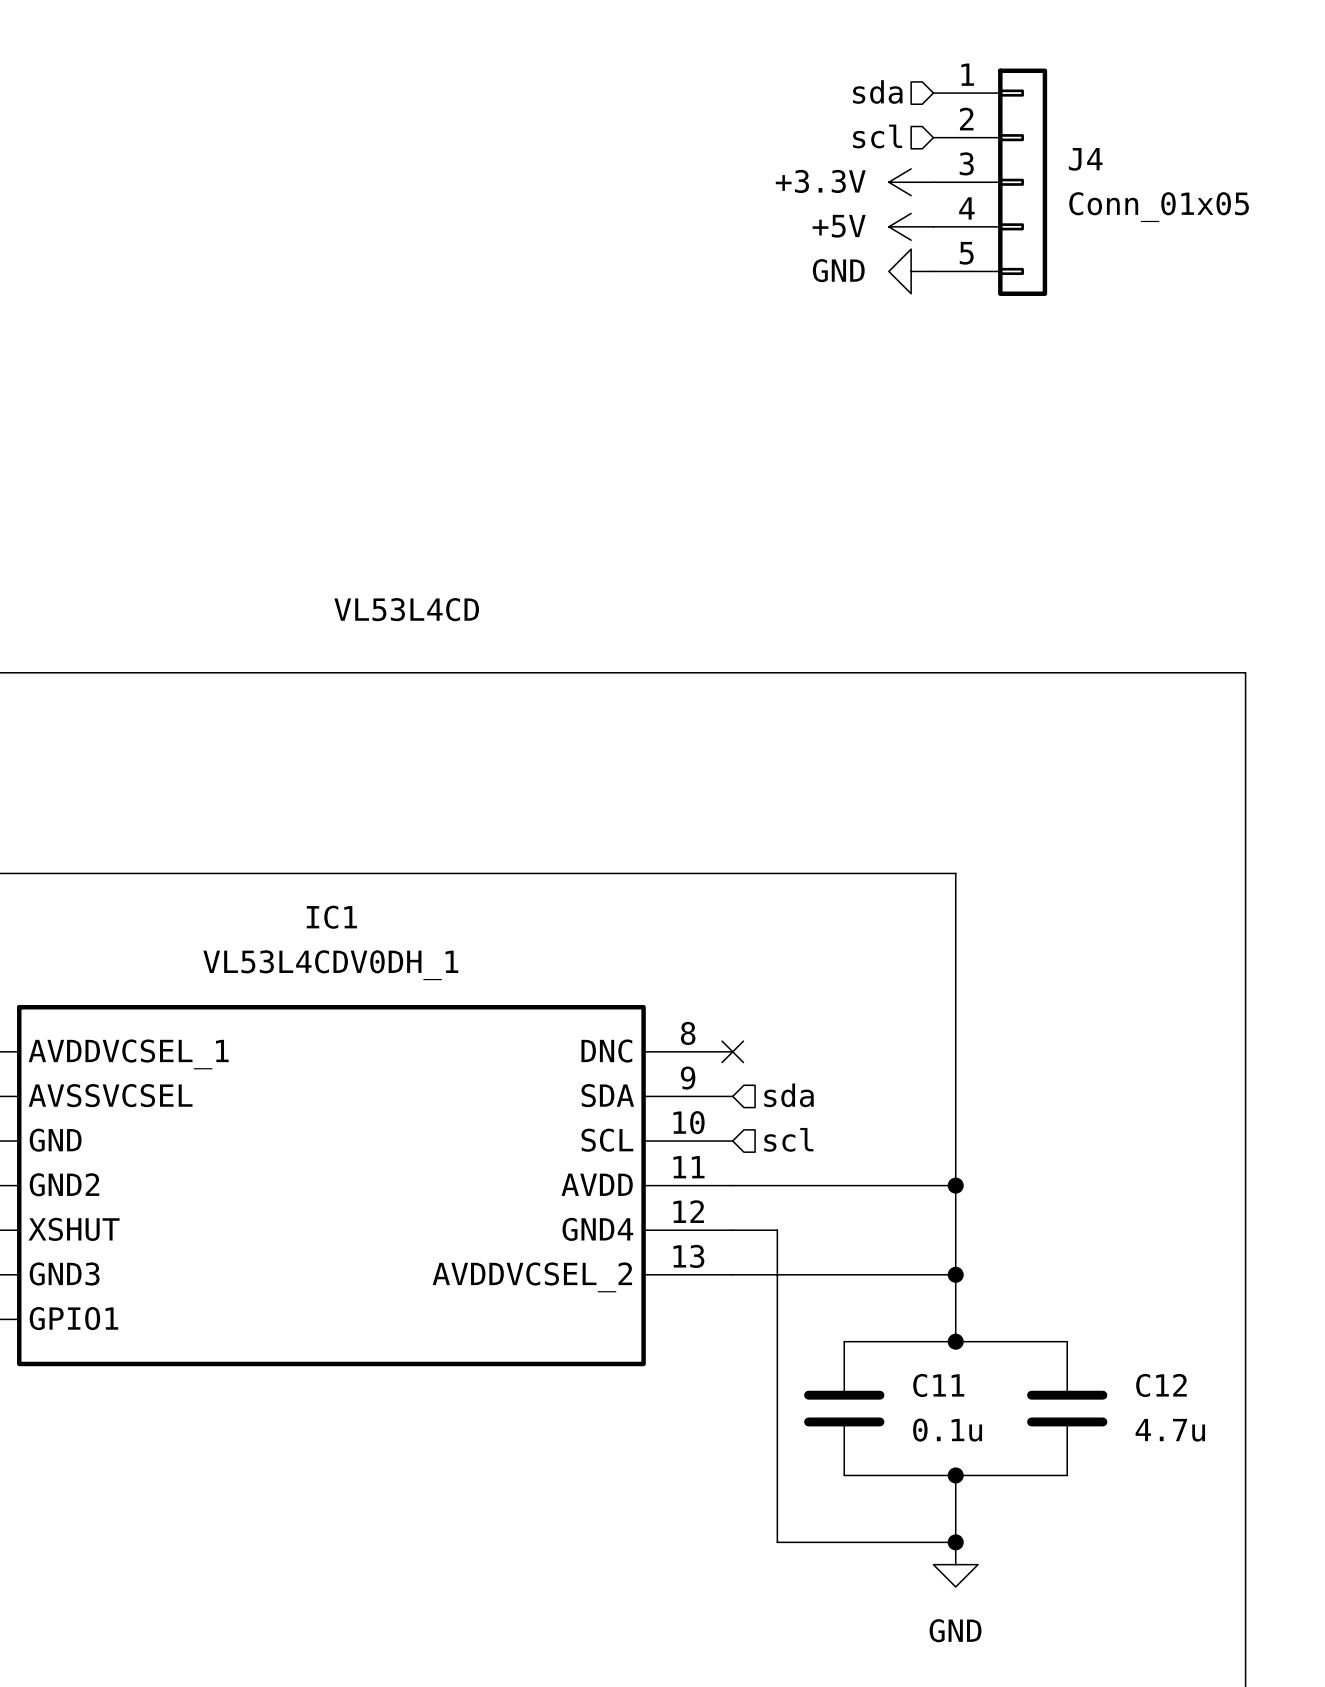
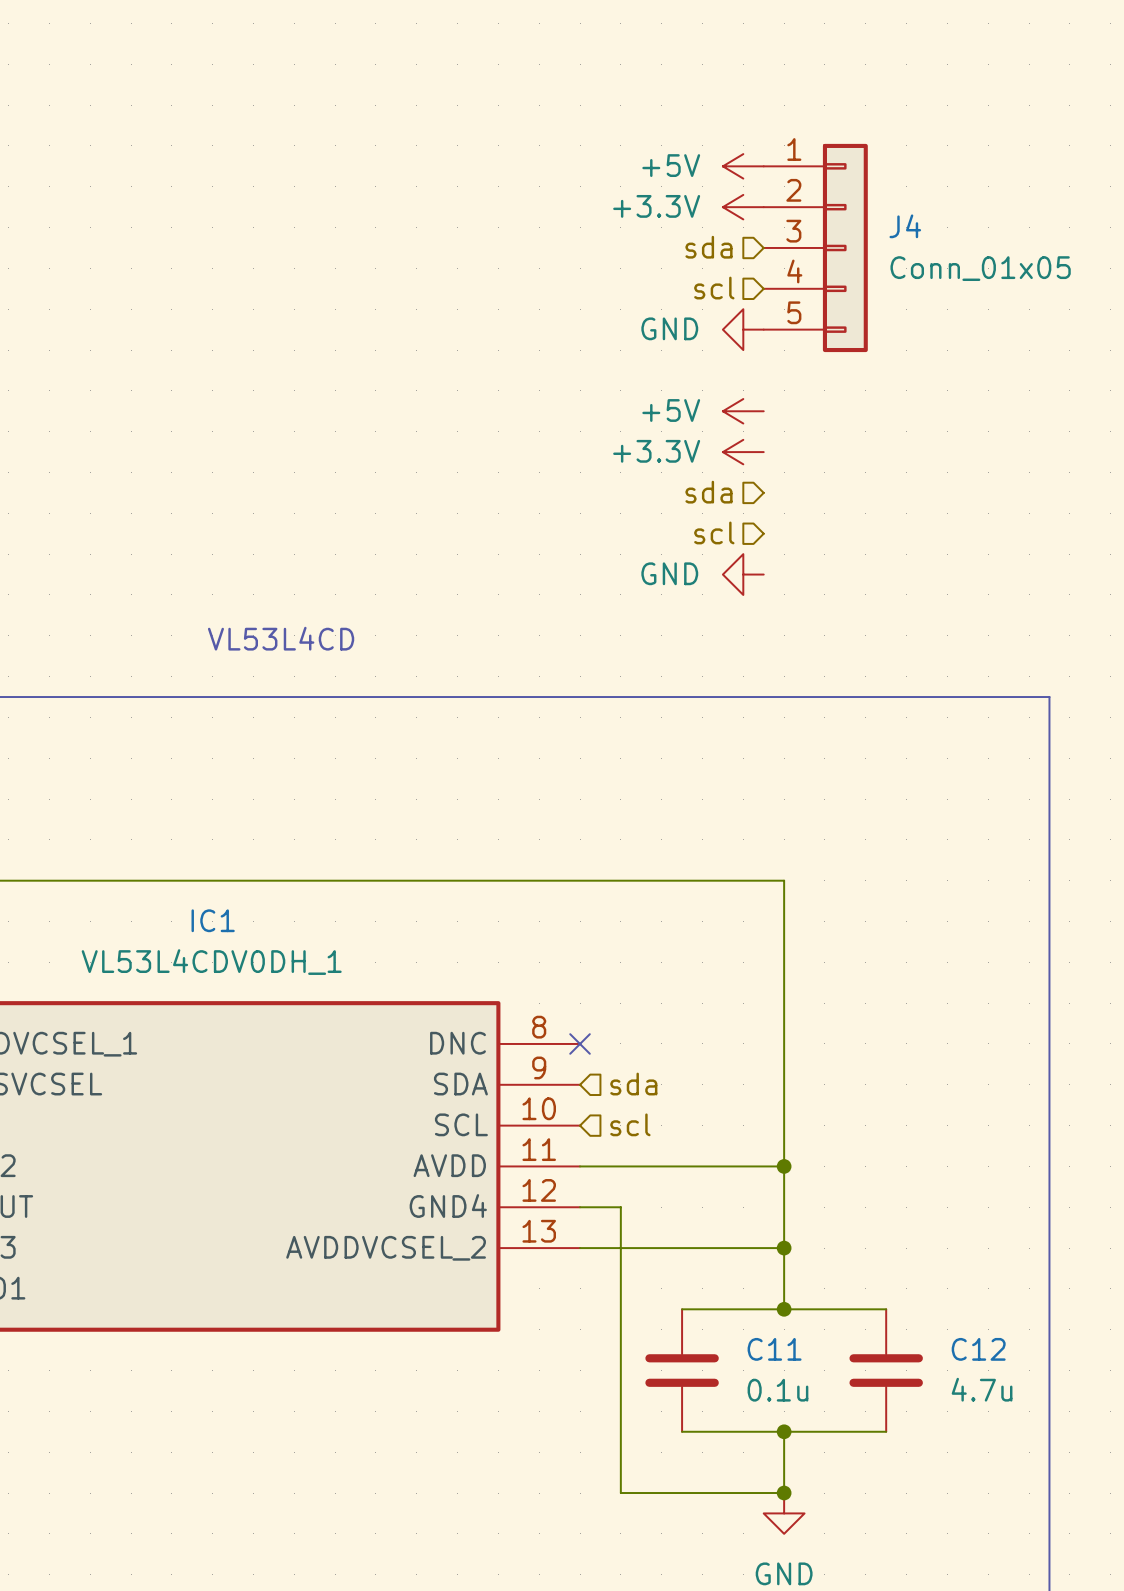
hierarchical label position: sda (877, 91) -> sda (708, 247)
power symbol: none -> +5V (743, 166)
hierarchical label position: scl (877, 136) -> scl (714, 288)
power symbol position: +3.3V (911, 182) -> +3.3V (743, 207)
power symbol: +5V (911, 226) -> none
power symbol: none -> +5V (743, 411)
power symbol: none -> +3.3V (743, 452)
hierarchical label: none -> sda (708, 492)
hierarchical label: none -> scl (714, 532)
power symbol: none -> GND (743, 574)

